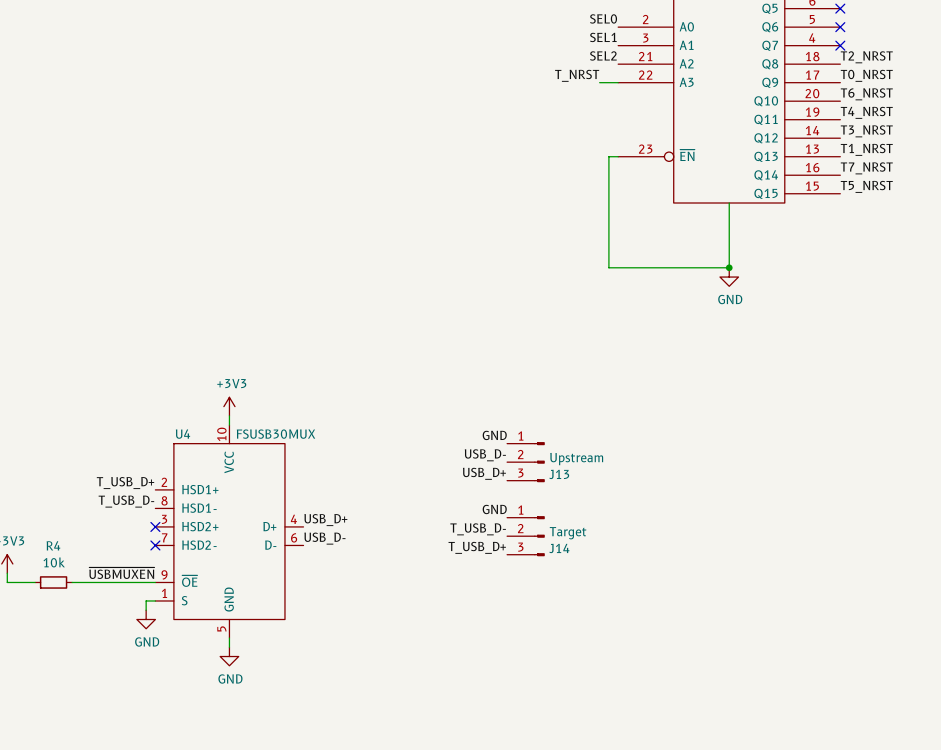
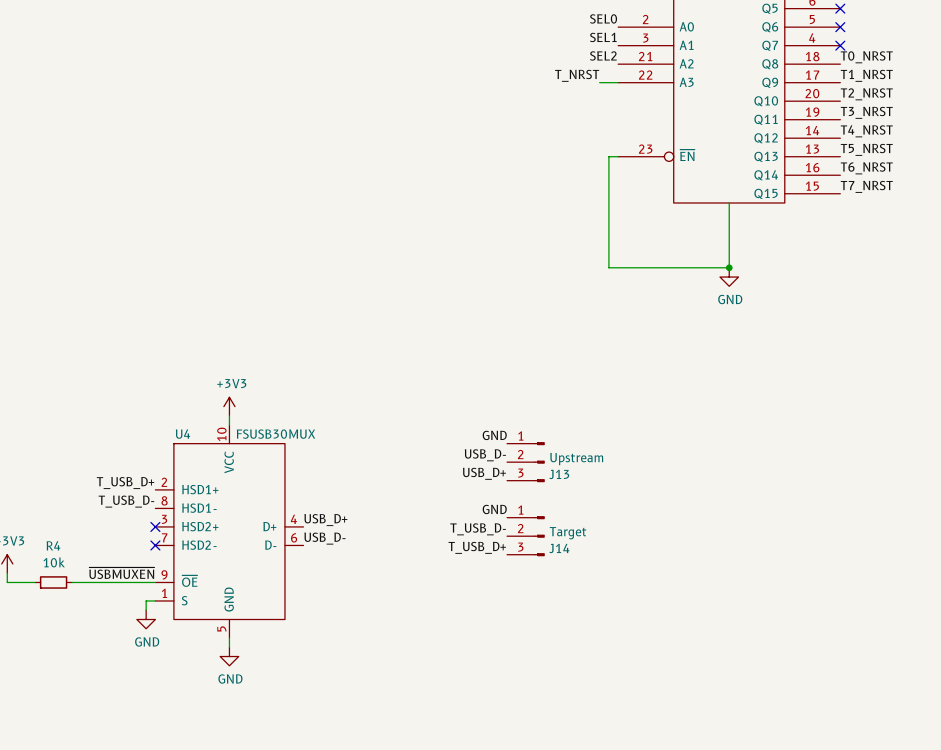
label: T2_NRST (866, 57) -> T0_NRST (866, 57)
label: T0_NRST (866, 75) -> T1_NRST (866, 75)
label: T6_NRST (866, 94) -> T2_NRST (866, 94)
label: T4_NRST (866, 112) -> T3_NRST (866, 112)
label: T3_NRST (866, 131) -> T4_NRST (866, 131)
label: T1_NRST (866, 149) -> T5_NRST (866, 149)
label: T7_NRST (866, 168) -> T6_NRST (866, 168)
label: T5_NRST (866, 186) -> T7_NRST (866, 186)

